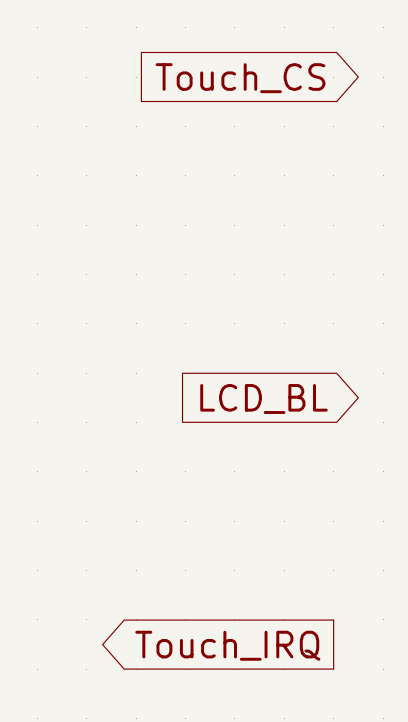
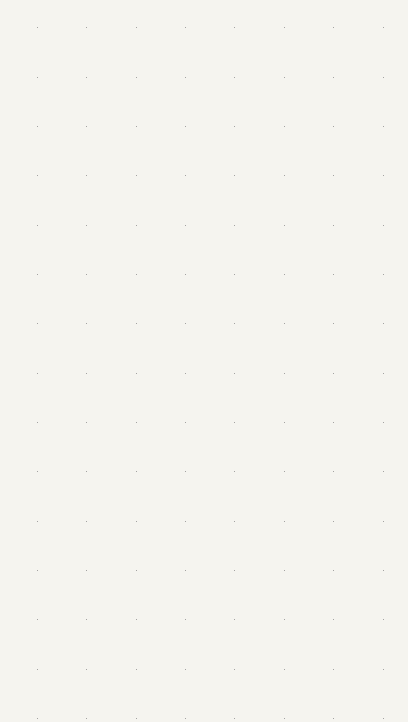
global label: Touch_CS (240, 78) -> none
global label: LCD_BL (263, 398) -> none
global label: Touch_IRQ (227, 645) -> none

